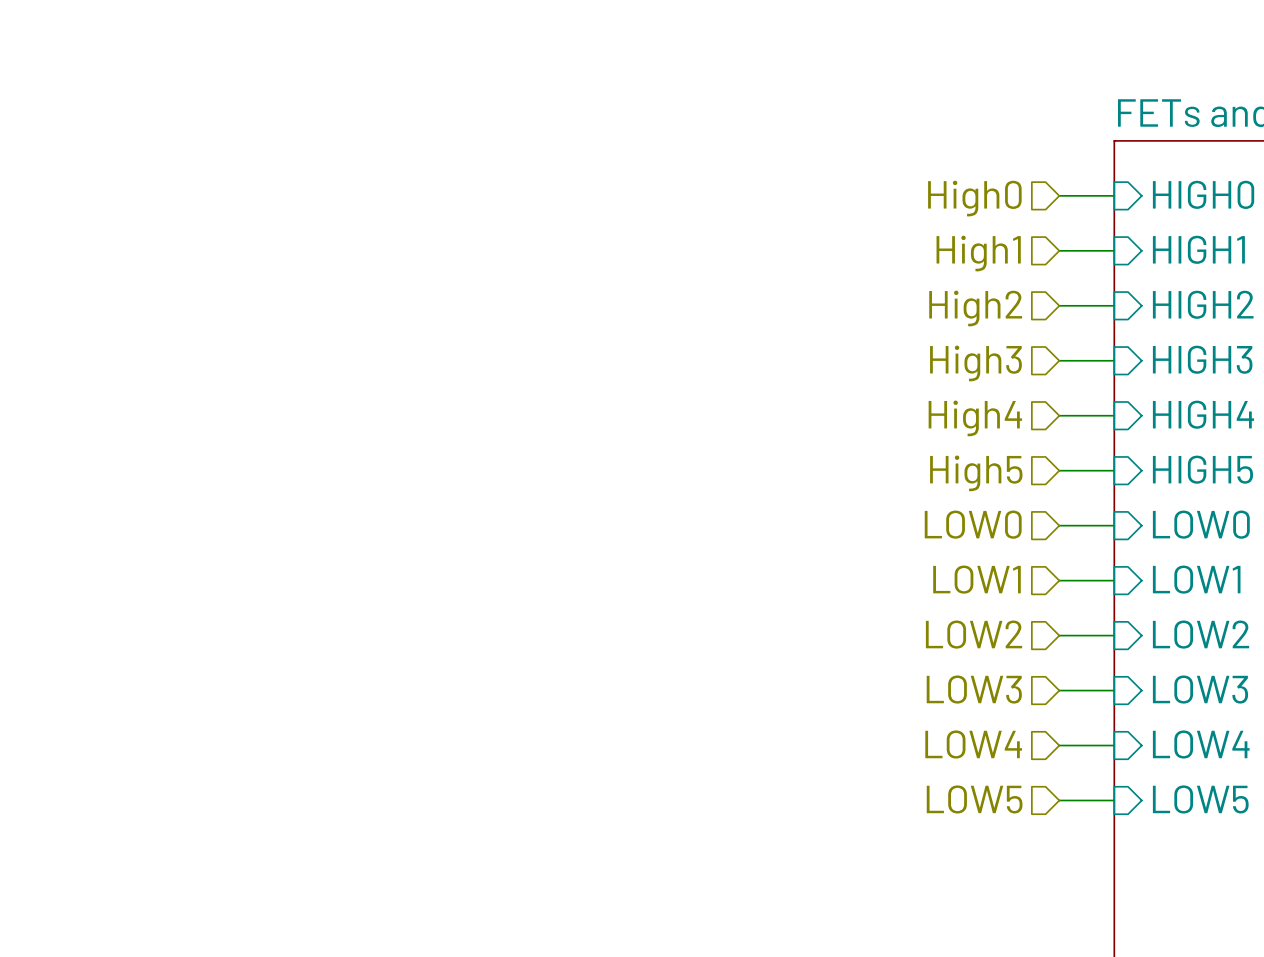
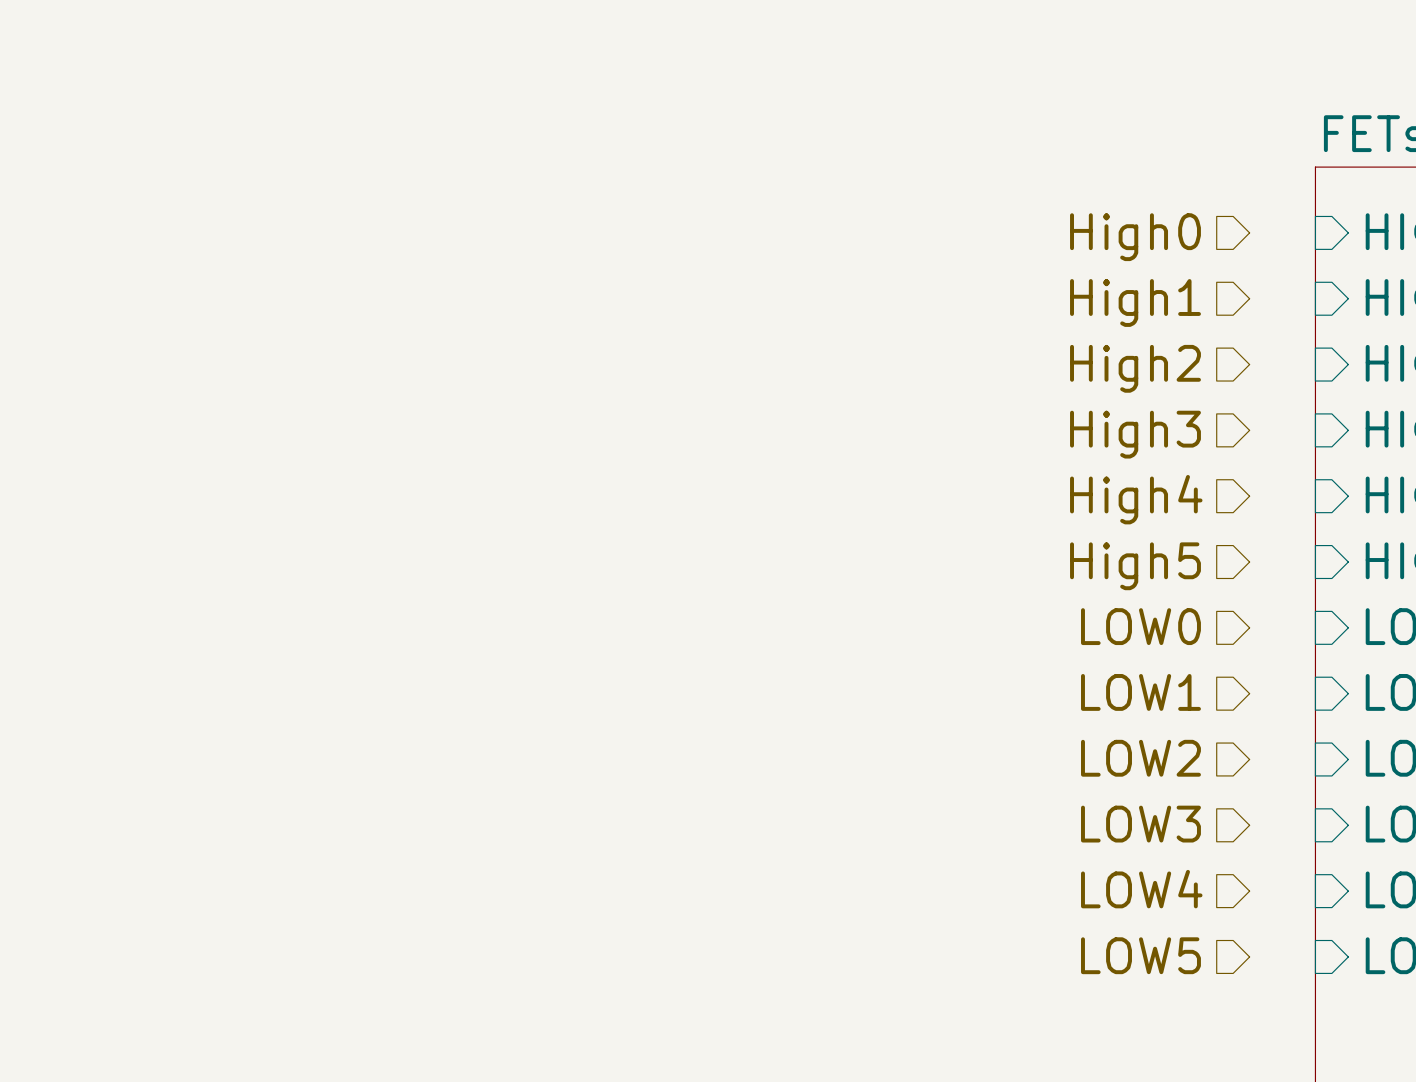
wire: (1059, 195) (1114, 195) -> none
wire: (1059, 250) (1114, 250) -> none
wire: (1059, 305) (1114, 305) -> none
wire: (1059, 360) (1114, 360) -> none
wire: (1059, 415) (1114, 415) -> none
wire: (1059, 470) (1114, 470) -> none
wire: (1059, 525) (1114, 525) -> none
wire: (1059, 580) (1114, 580) -> none
wire: (1059, 635) (1114, 635) -> none
wire: (1059, 690) (1114, 690) -> none
wire: (1059, 745) (1114, 745) -> none
wire: (1059, 800) (1114, 800) -> none

